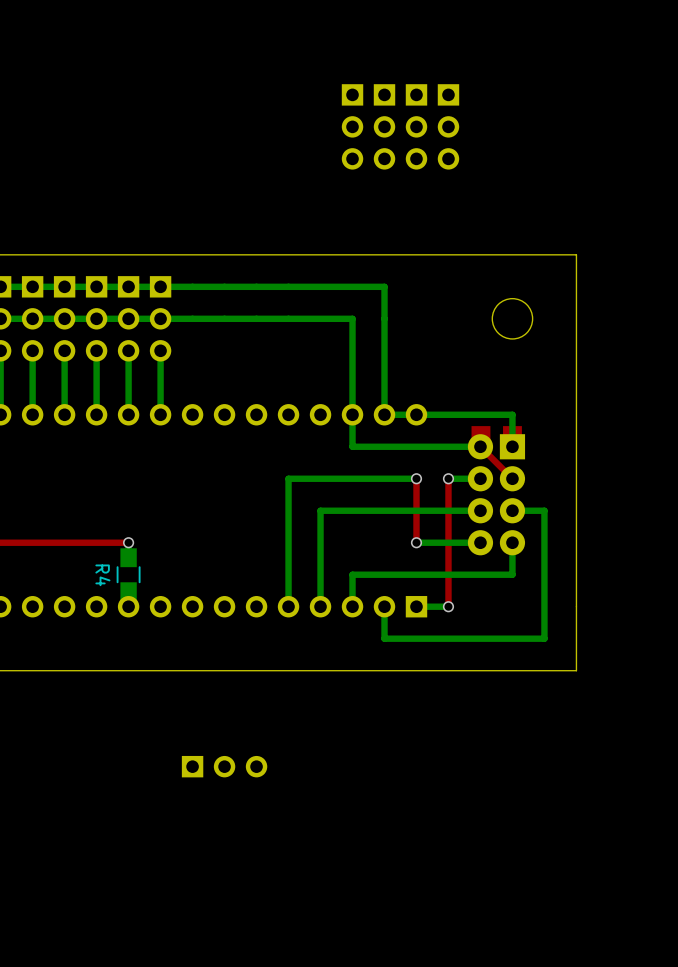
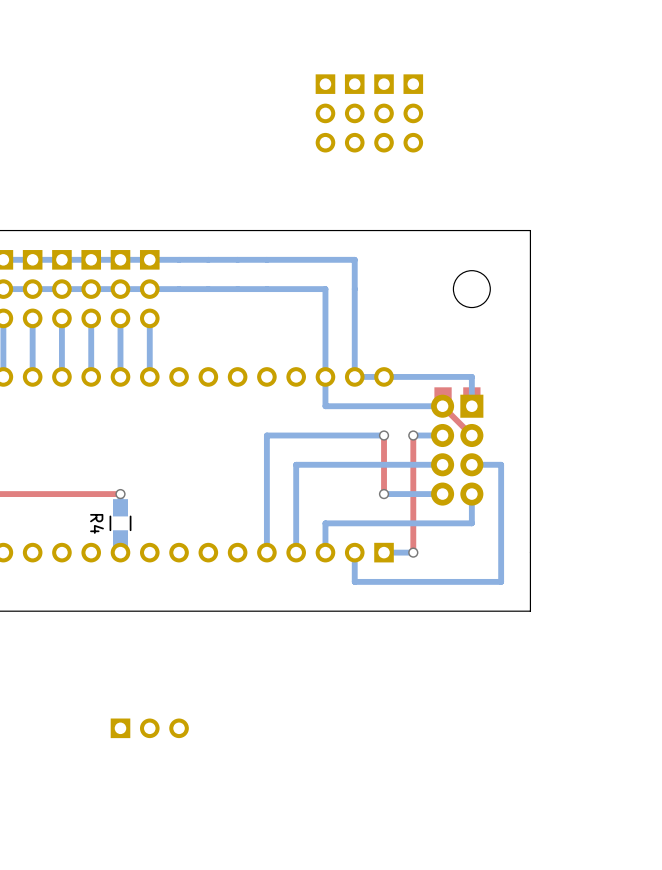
part position: (224, 766) -> (149, 728)

